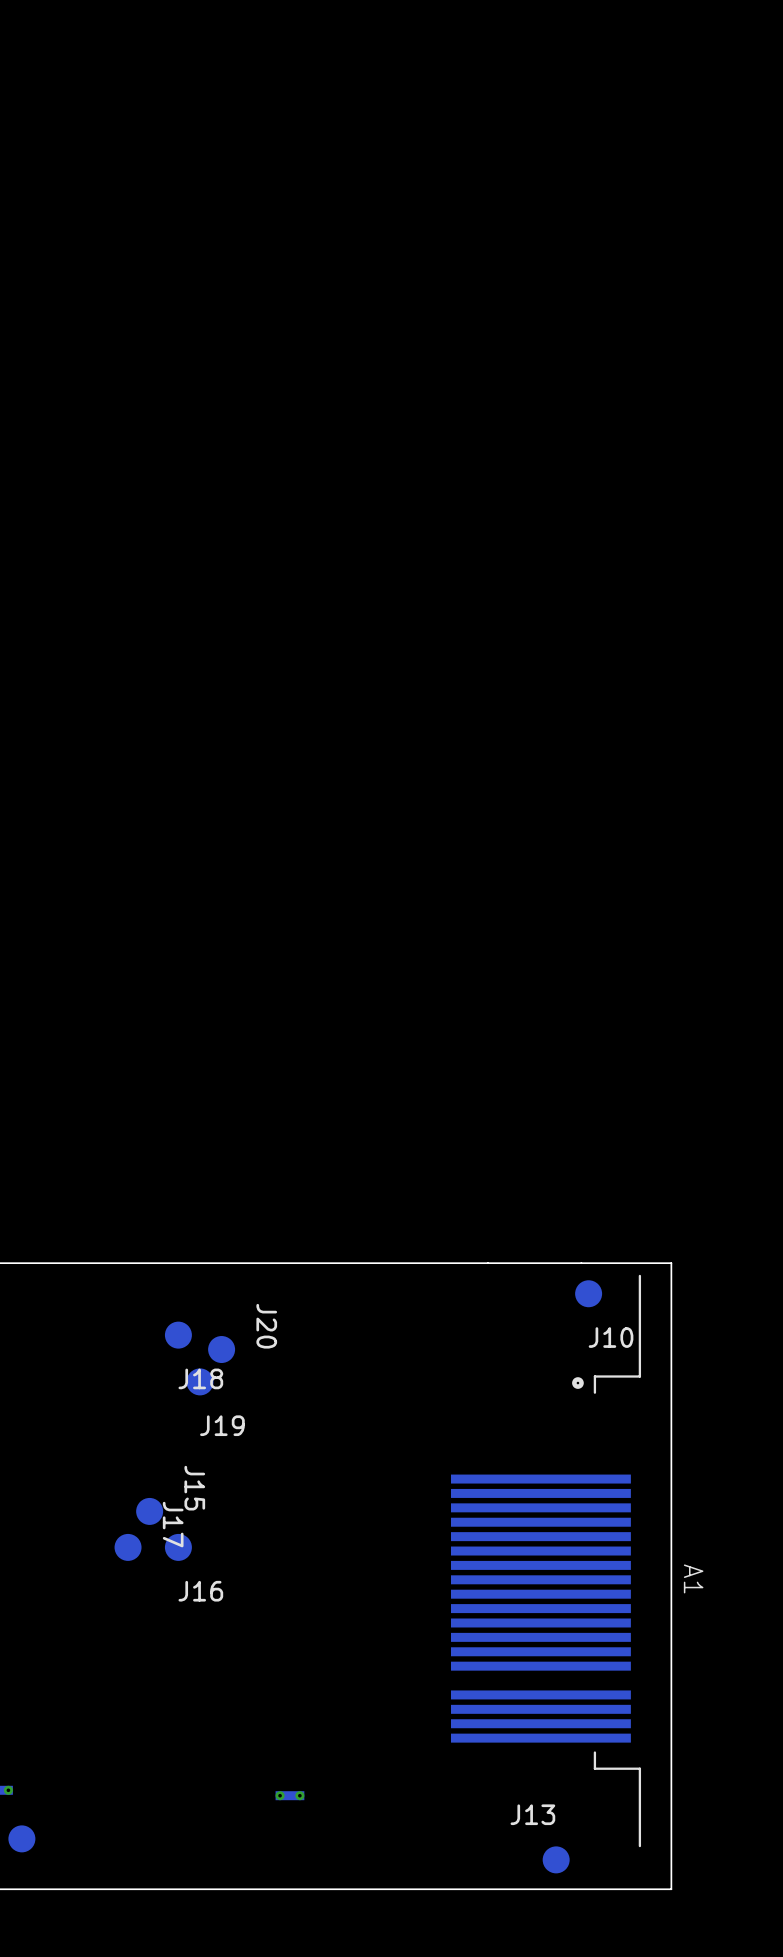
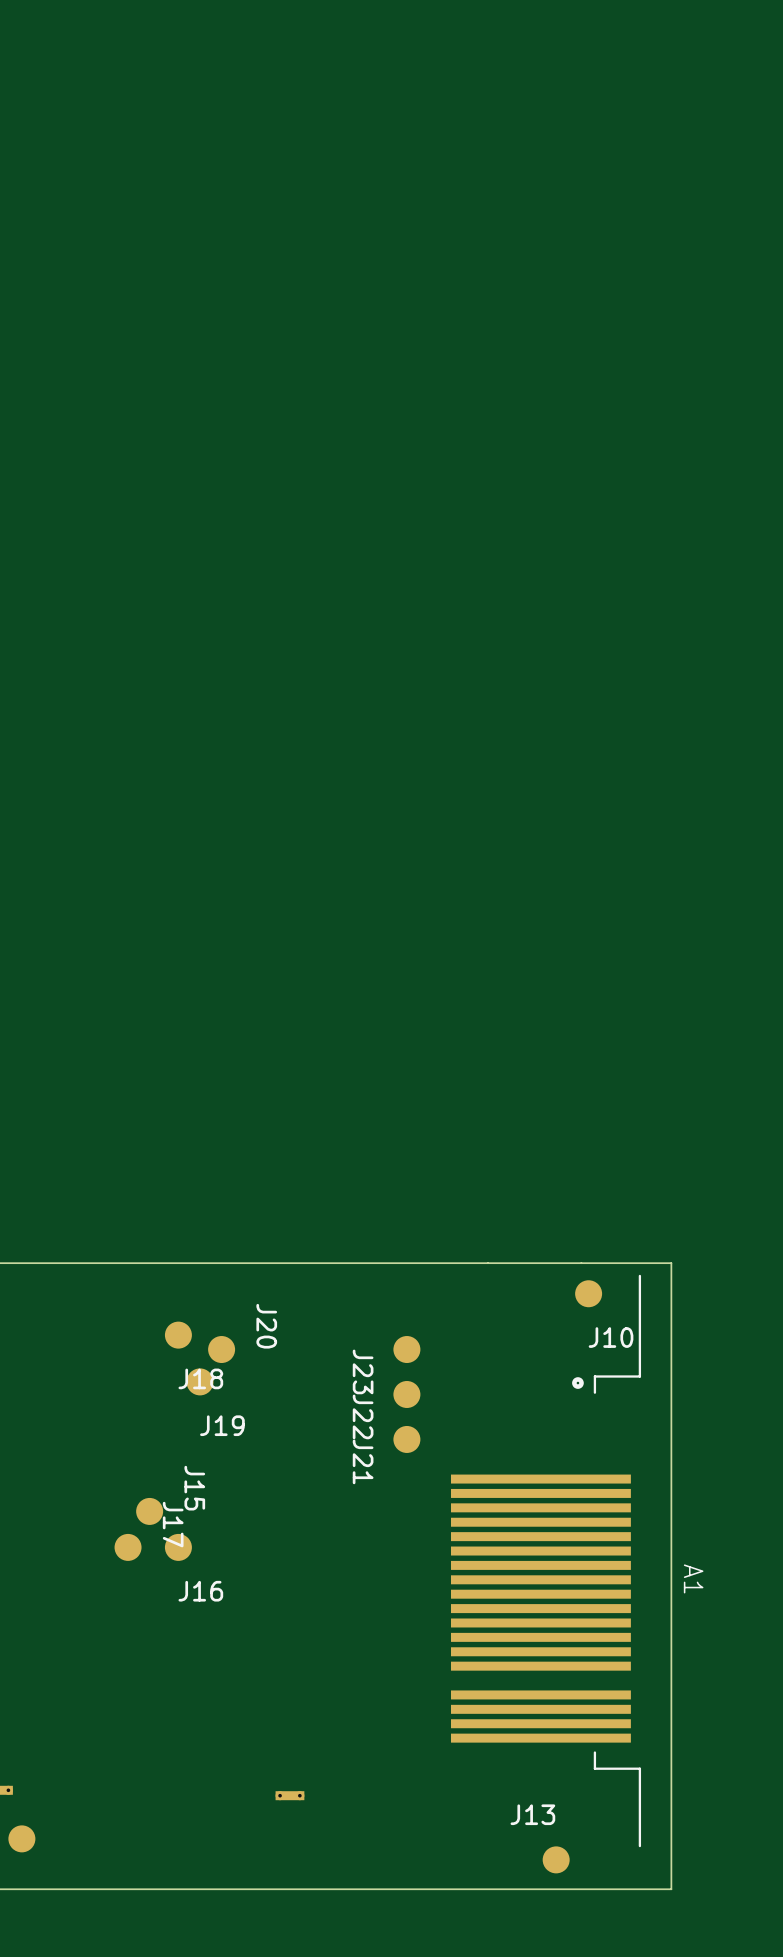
J23: none -> (406, 1349)
J22: none -> (406, 1394)
J21: none -> (406, 1439)

